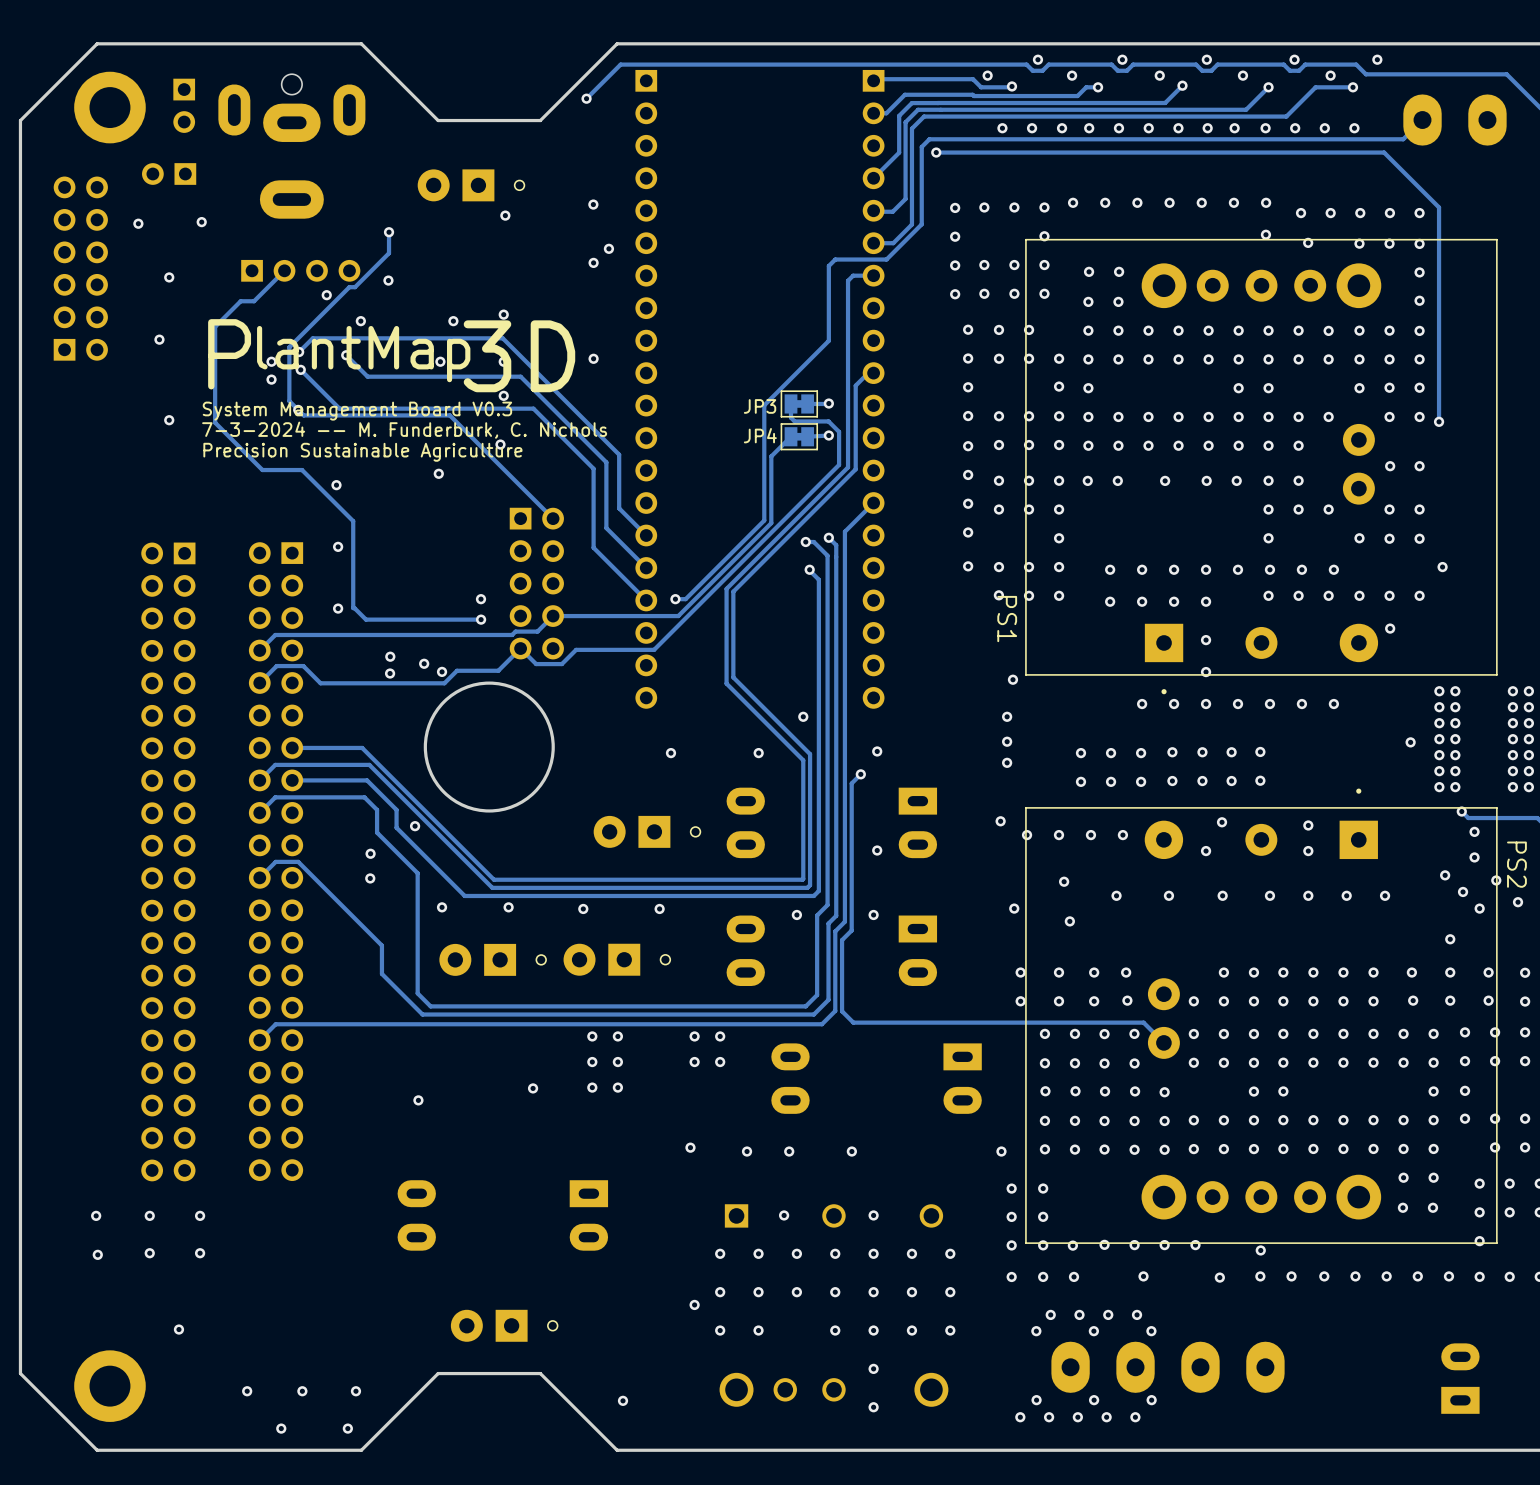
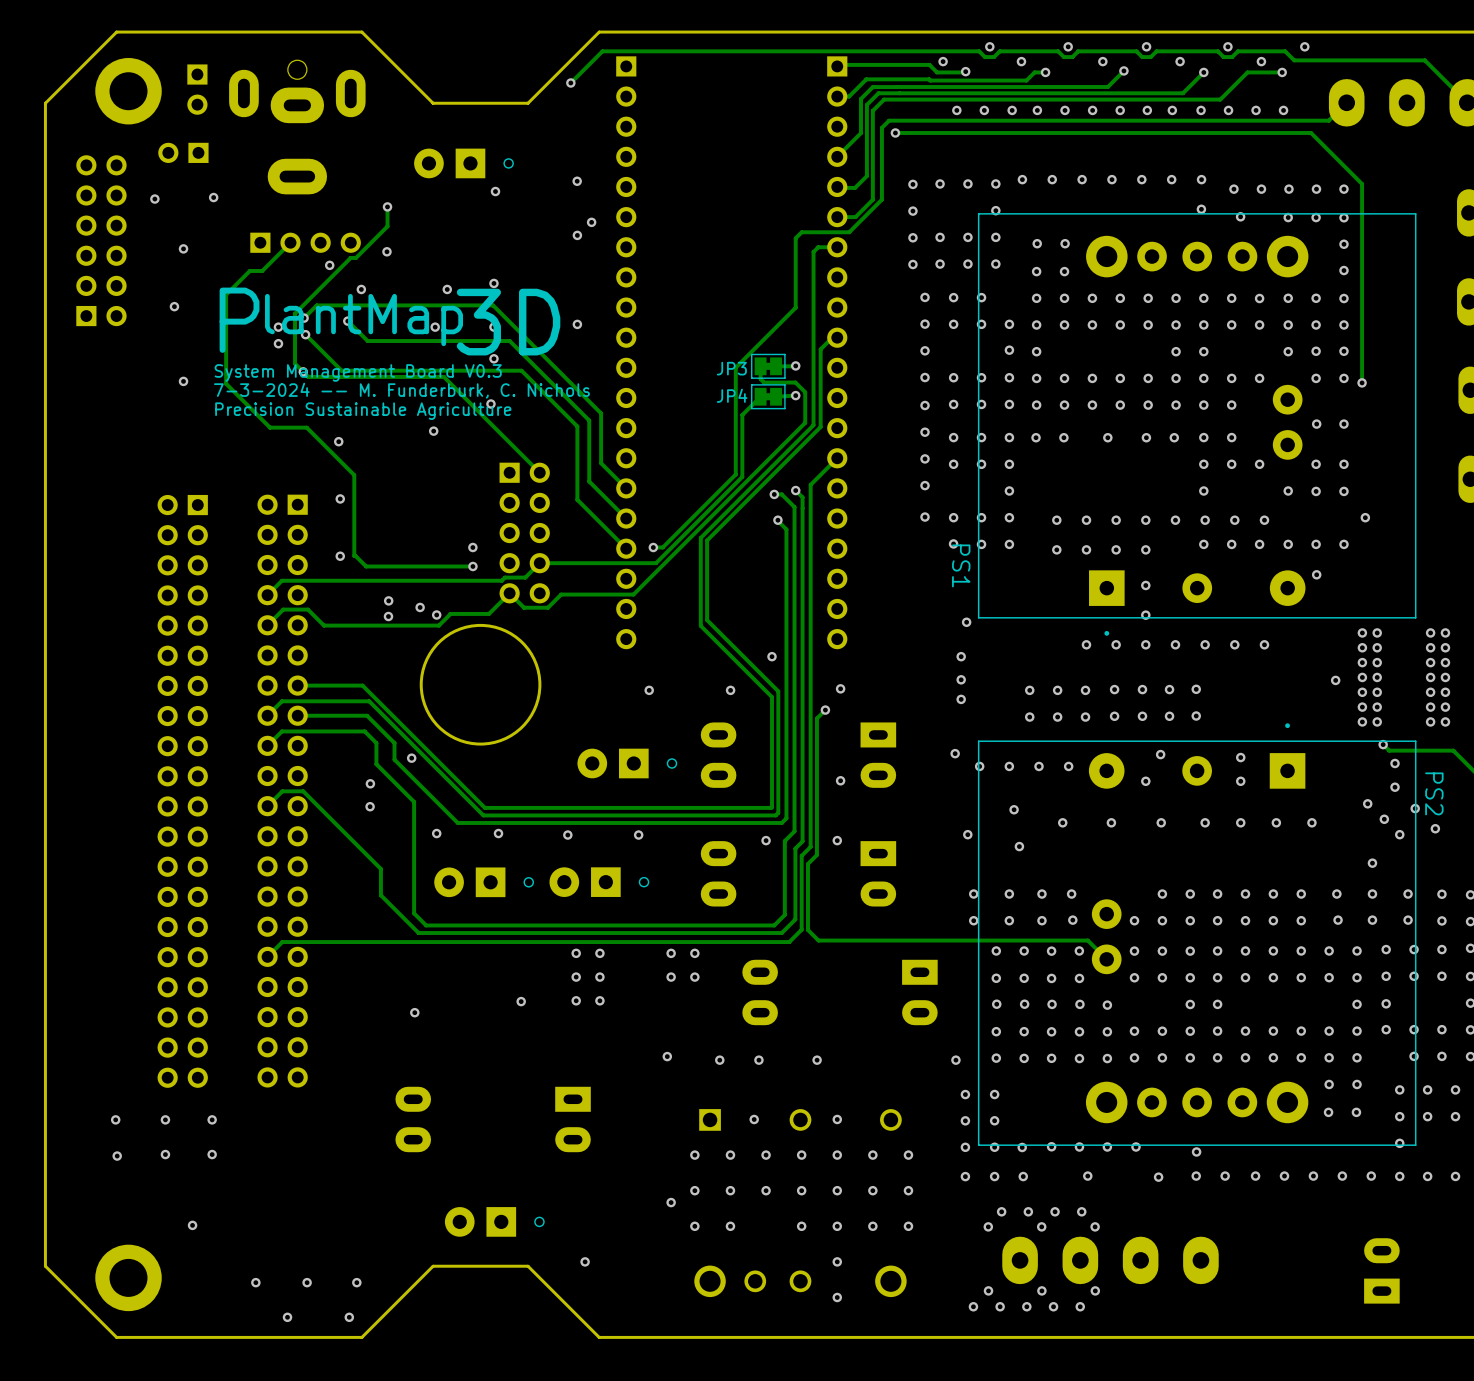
via position: (623, 1400) -> (585, 1261)

